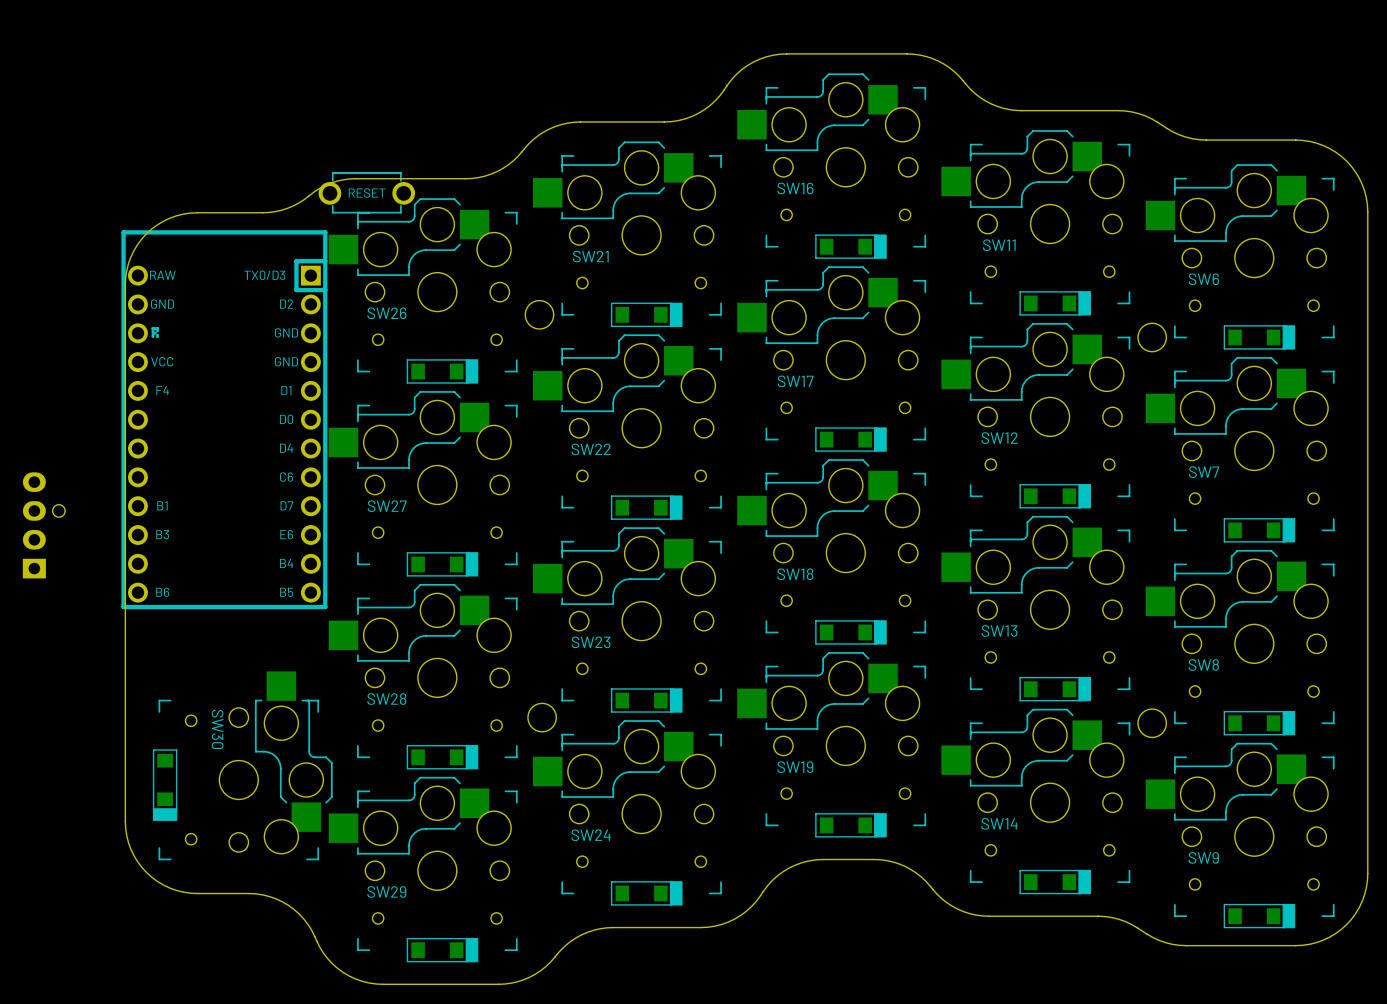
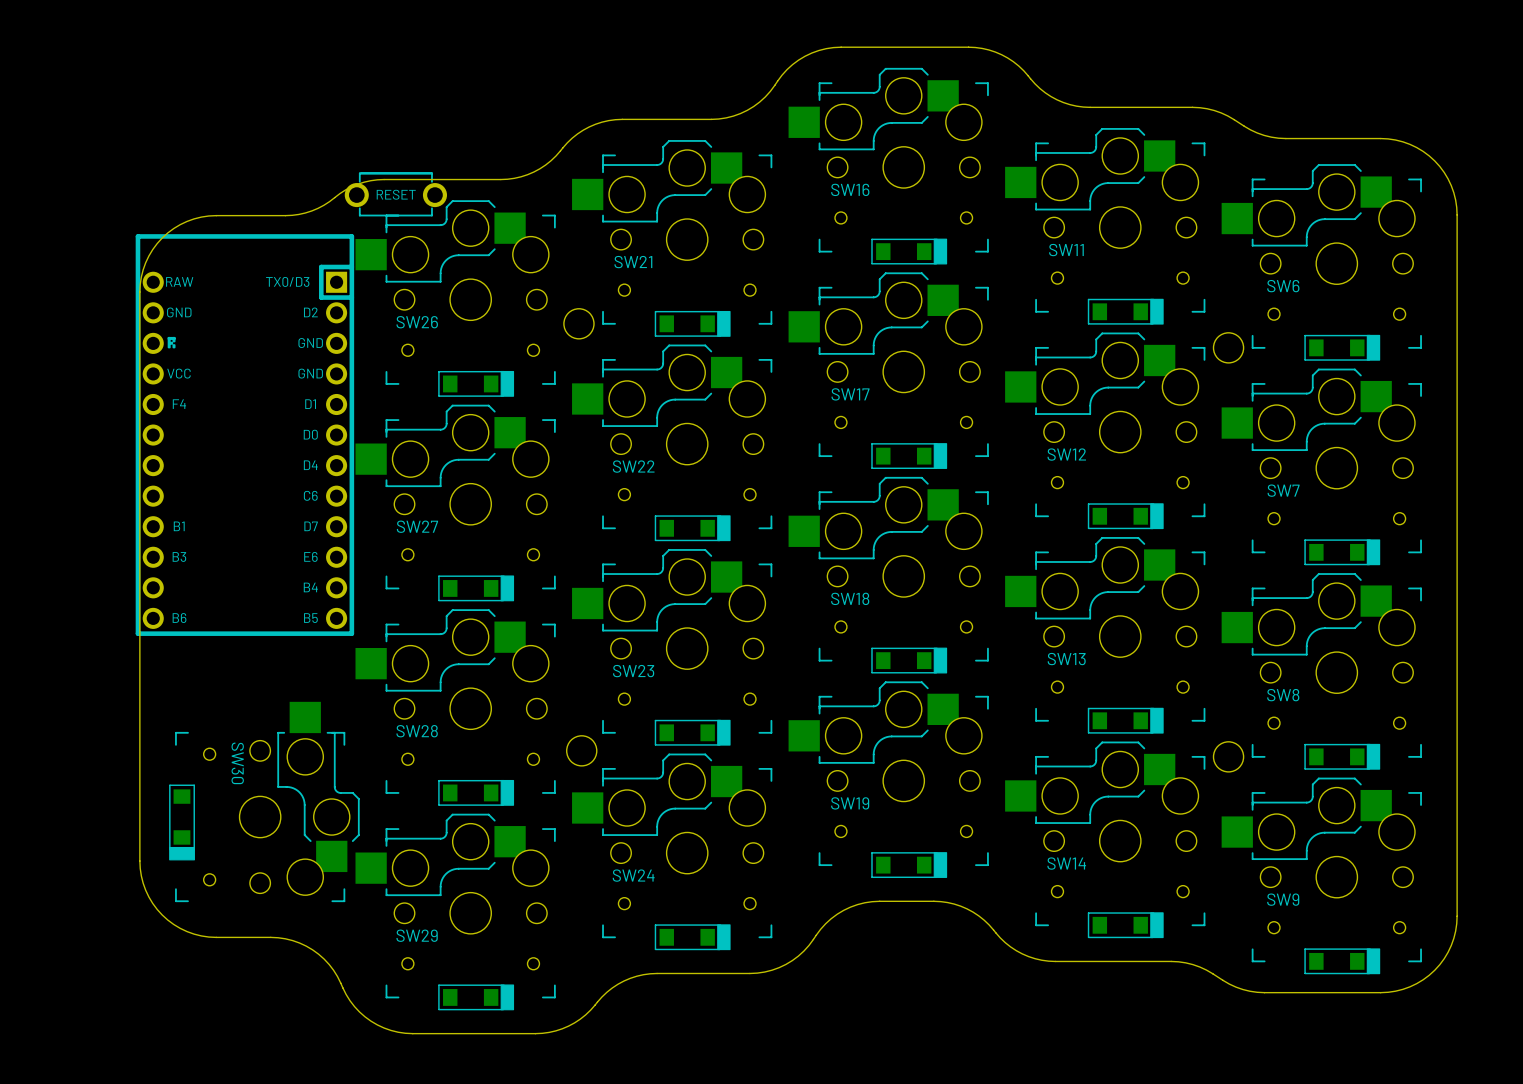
part: (43, 525) -> none

